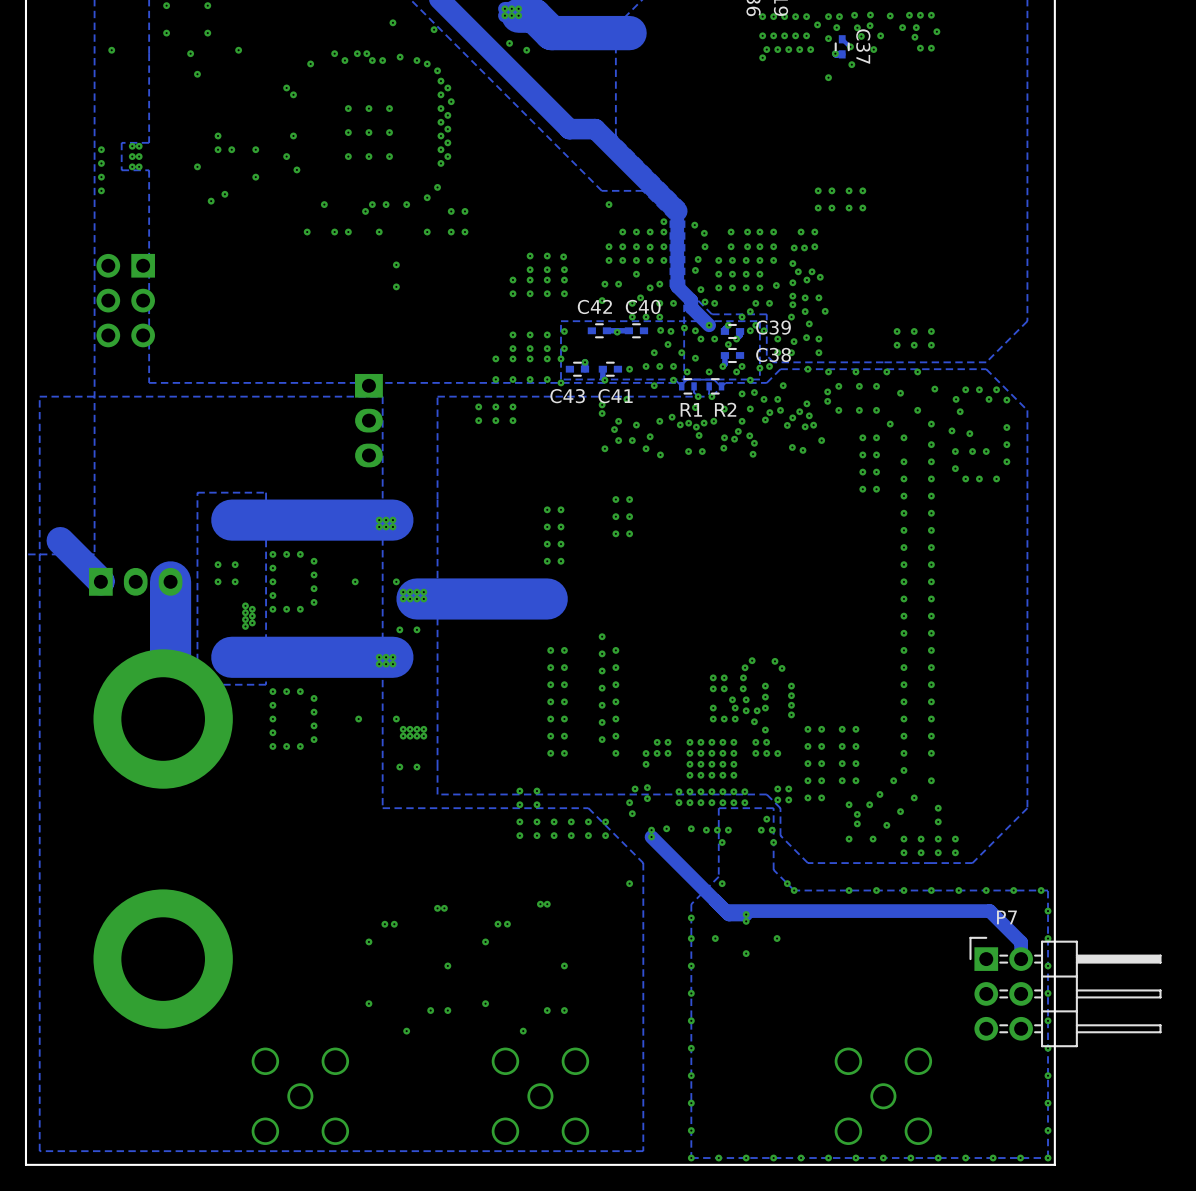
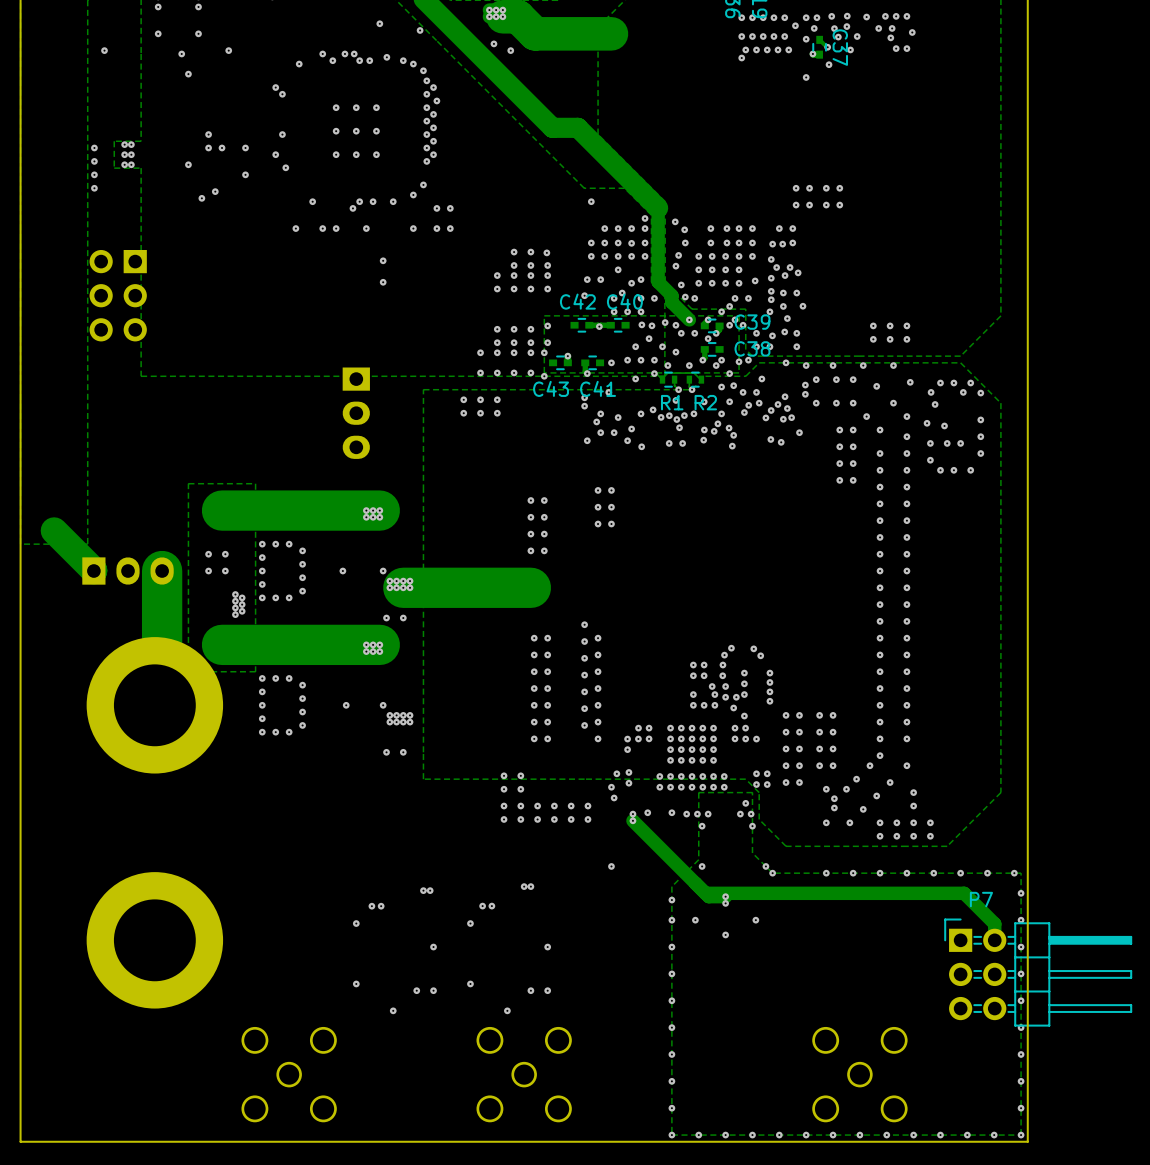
zone outline: (382, 396) (39, 396) (39, 1151) (643, 1151) (643, 863) (588, 808) (382, 808) (382, 396) -> none

